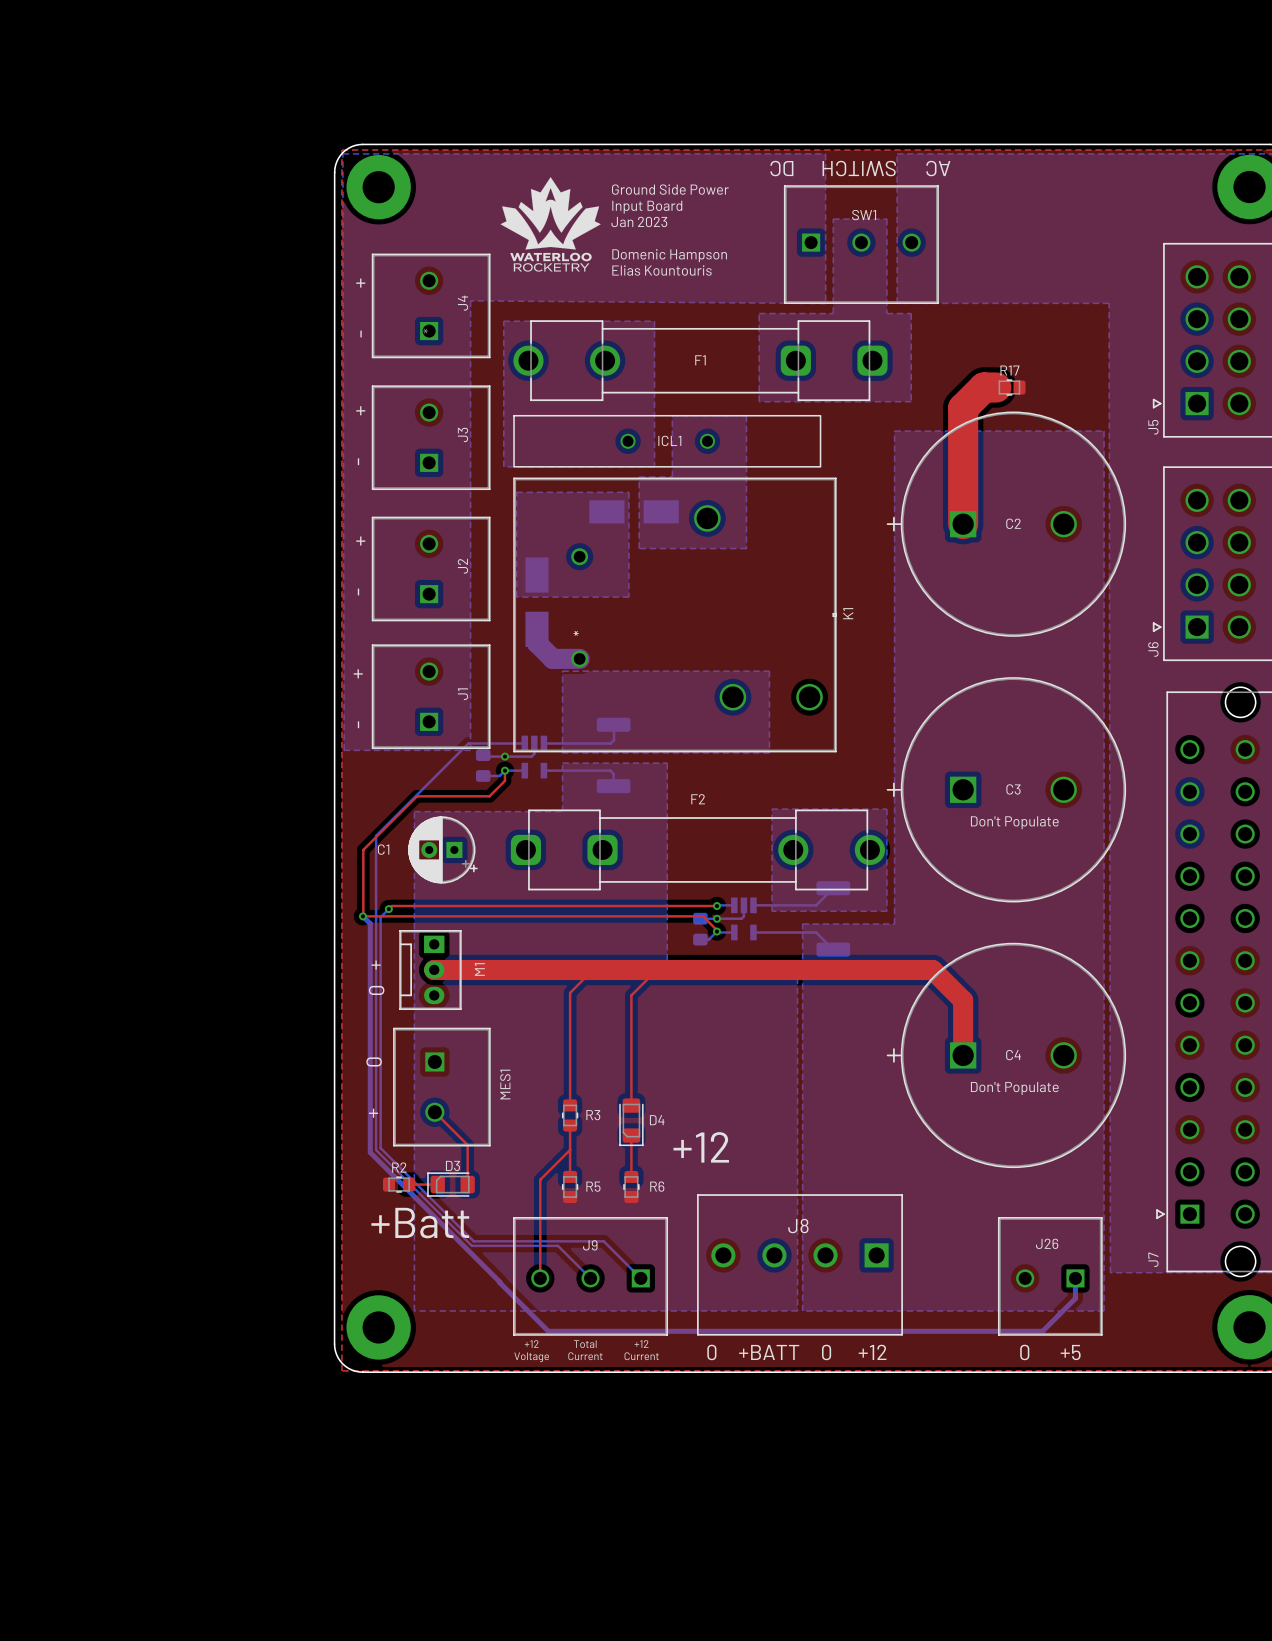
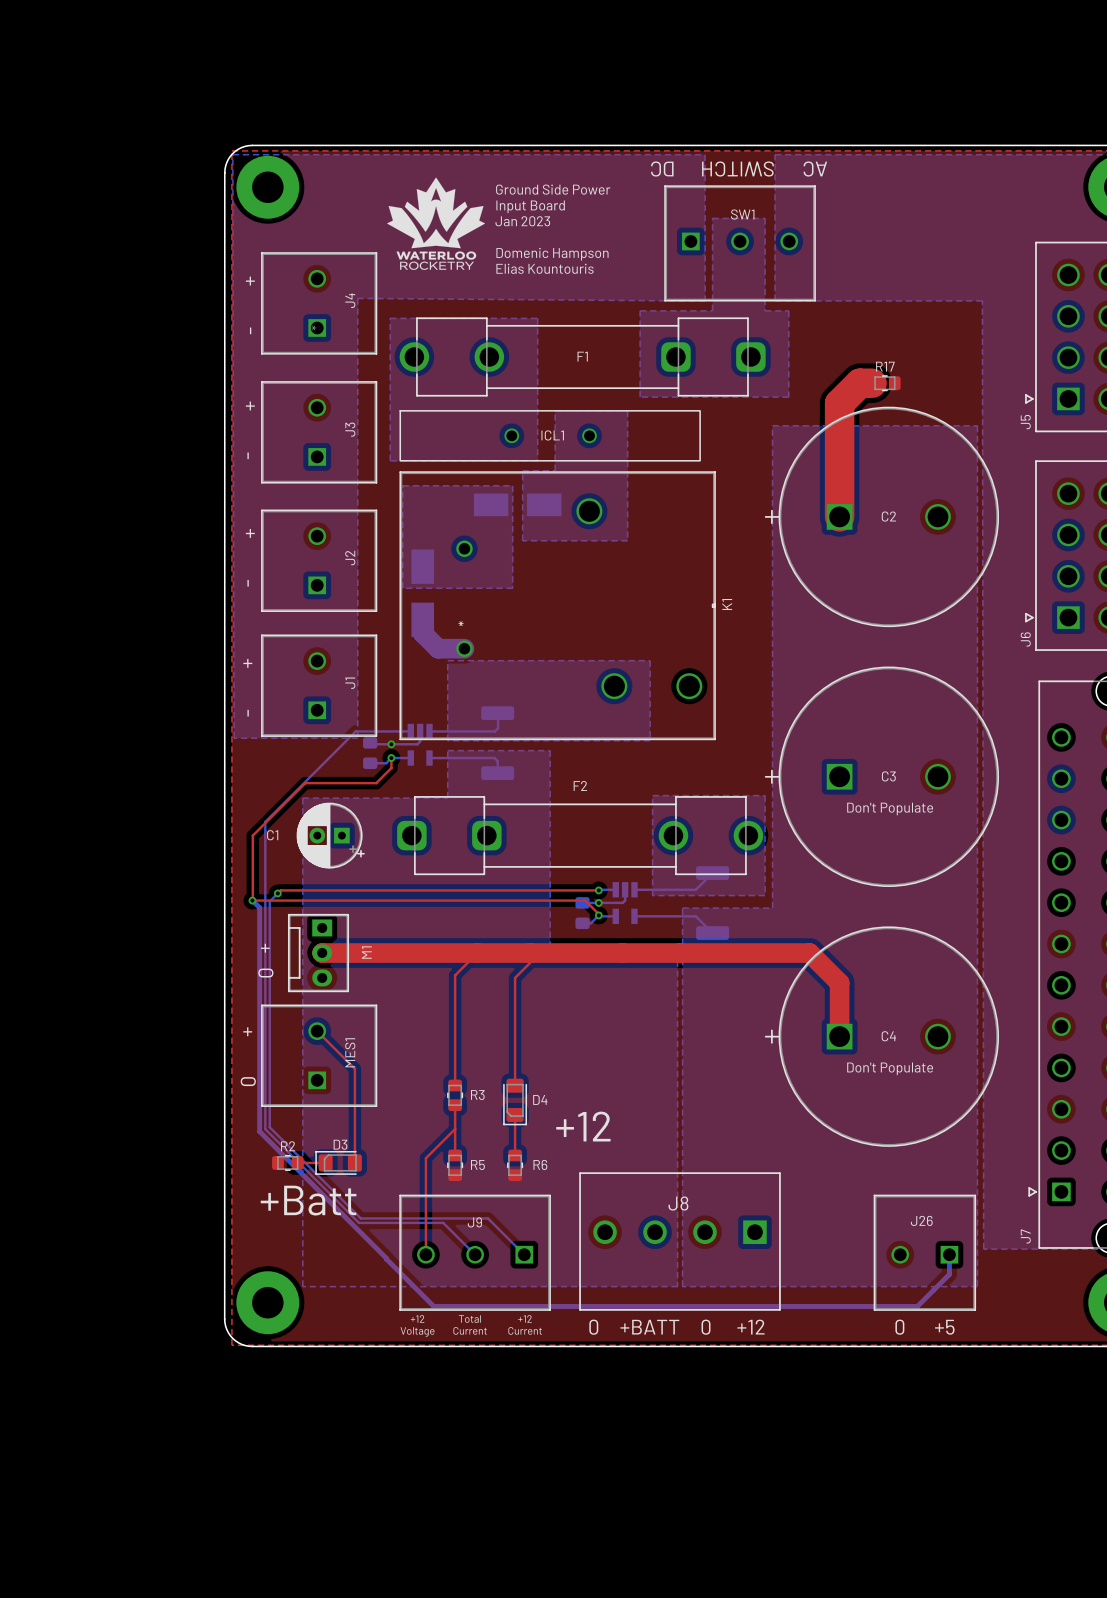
MES1 footprint: [393, 1027, 491, 1147] -> [261, 1004, 378, 1107]
text position: 0 (374, 1061) -> 0 (248, 1081)
MES1 name position: MES1 (505, 1084) -> MES1 (350, 1052)
top track: (434, 1112) (467, 1145) -> (317, 1031) (354, 1068) (354, 1124)
text position: + (373, 1113) -> + (247, 1031)

